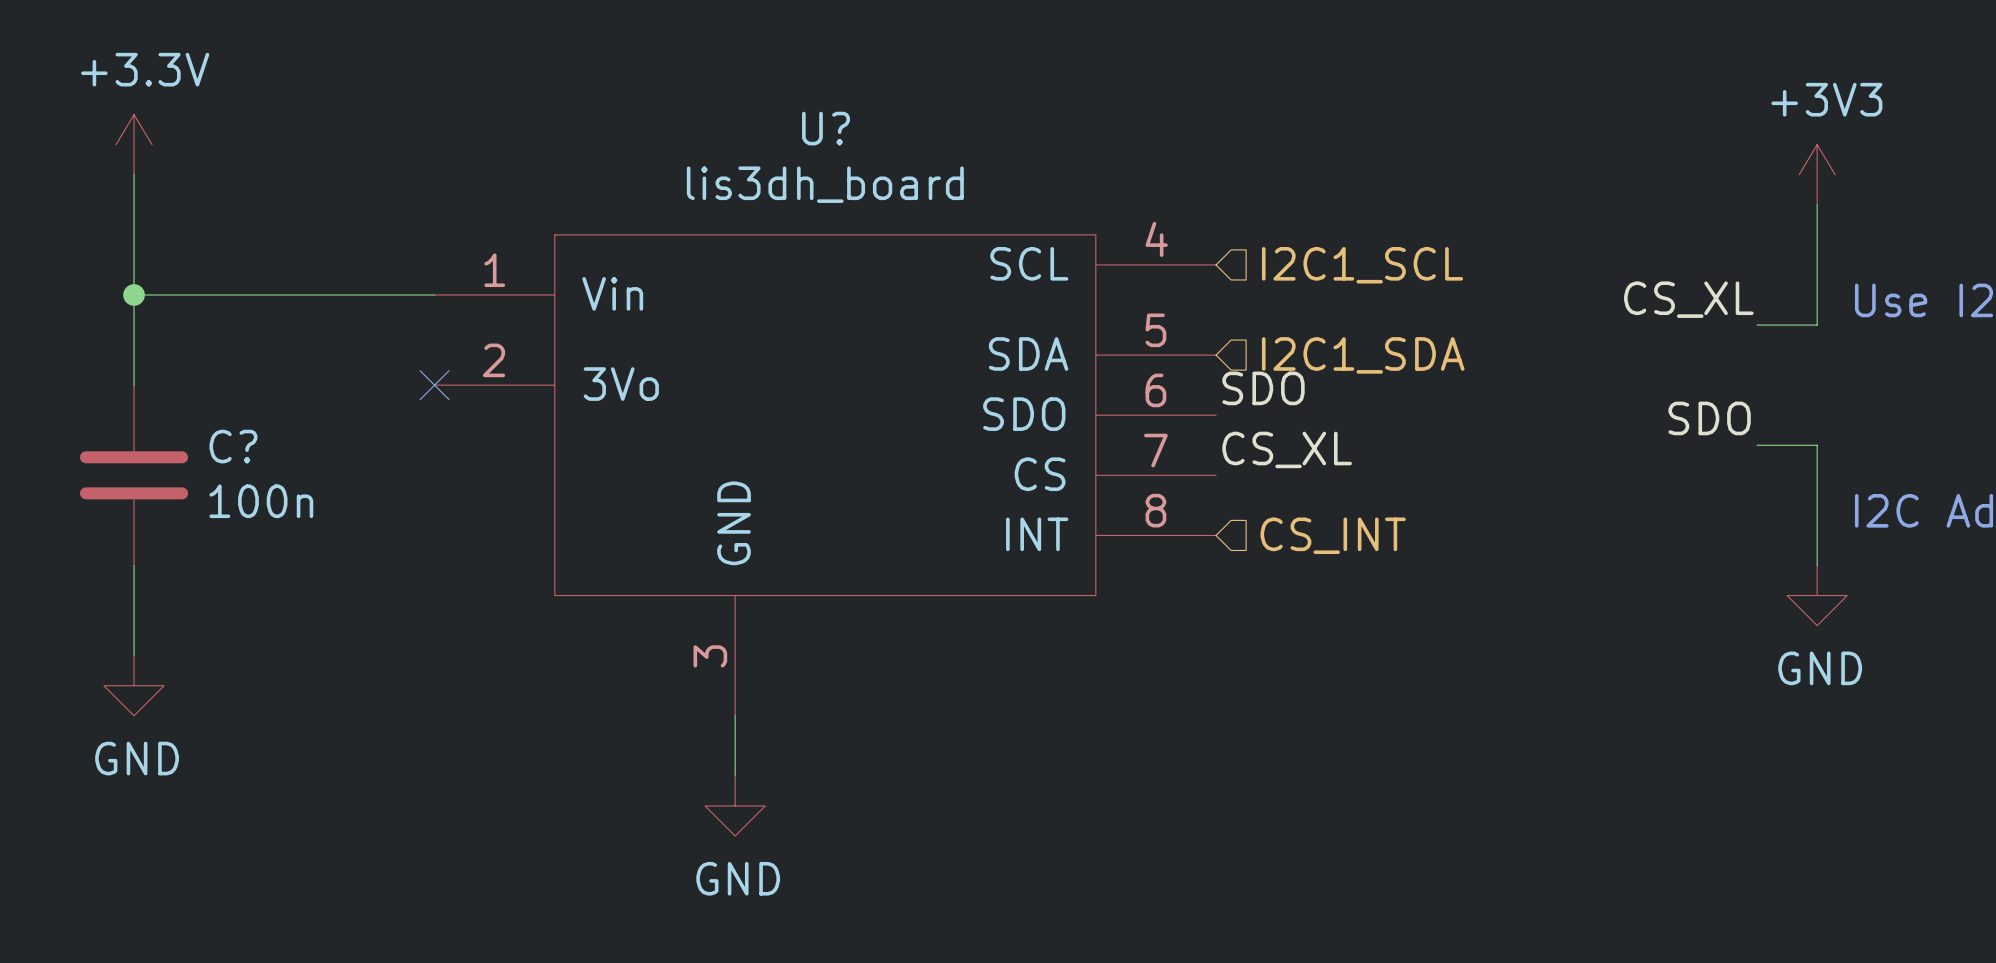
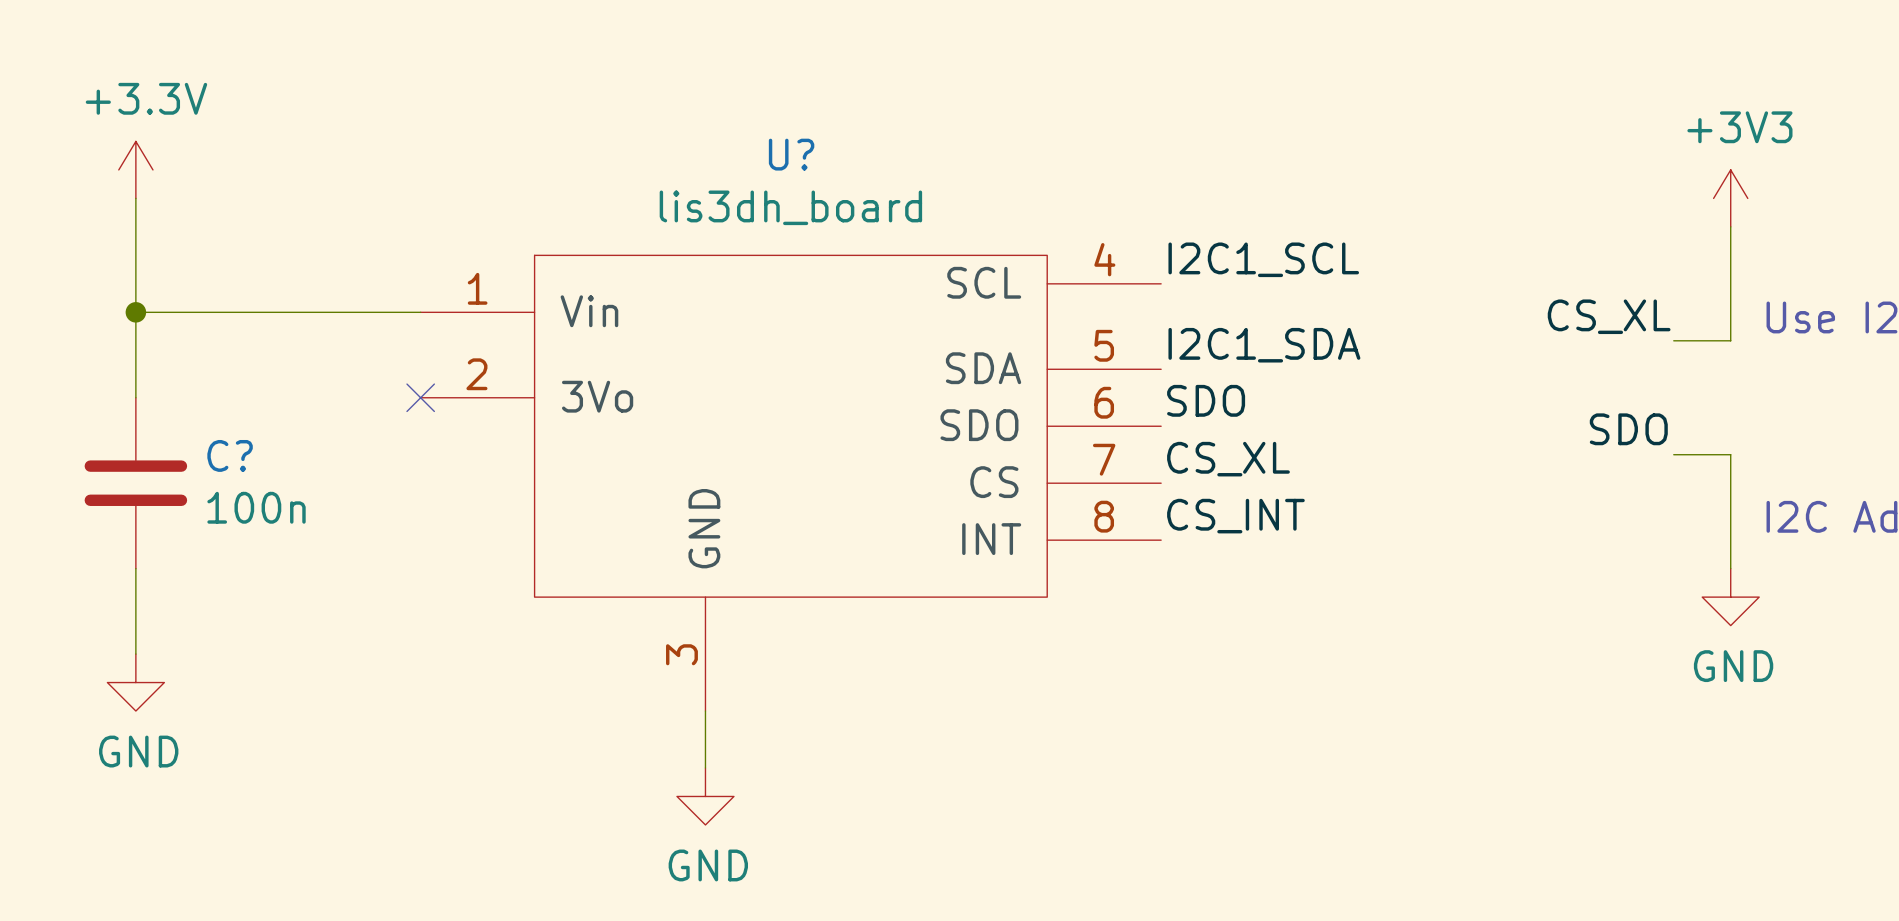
label: none -> I2C1_SCL (1263, 259)
hierarchical label: I2C1_SCL (1362, 265) -> none
label: none -> I2C1_SDA (1264, 345)
hierarchical label: I2C1_SDA (1363, 355) -> none
label: none -> CS_INT (1235, 516)
hierarchical label: CS_INT (1333, 535) -> none

